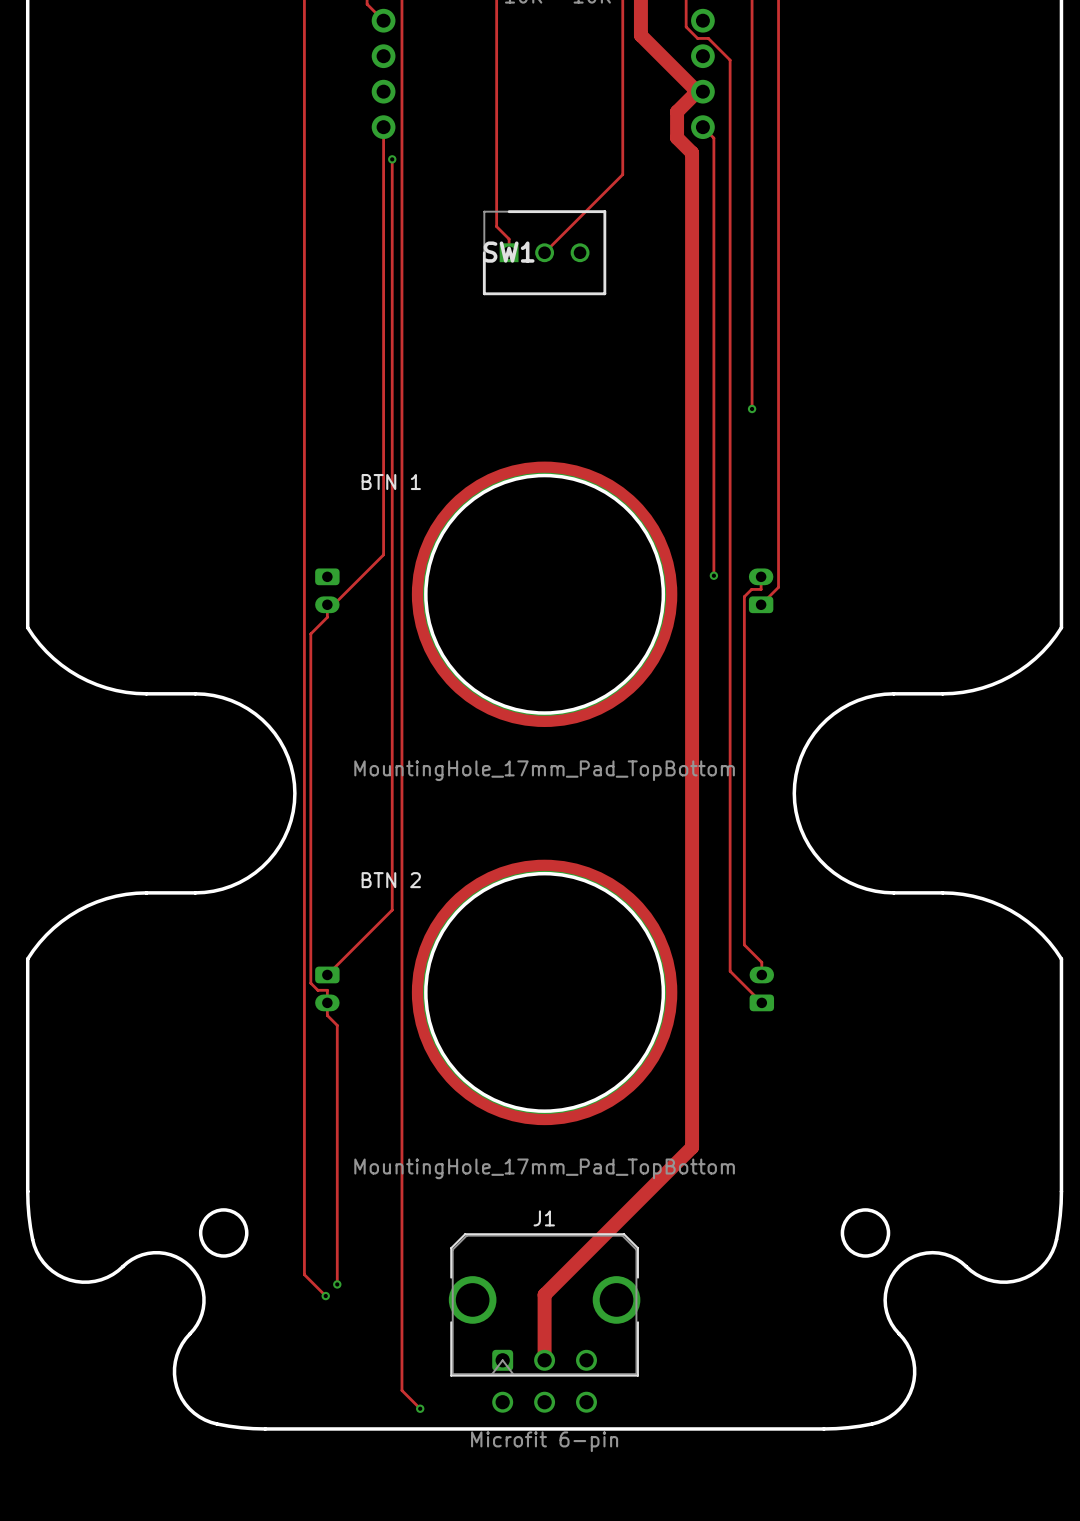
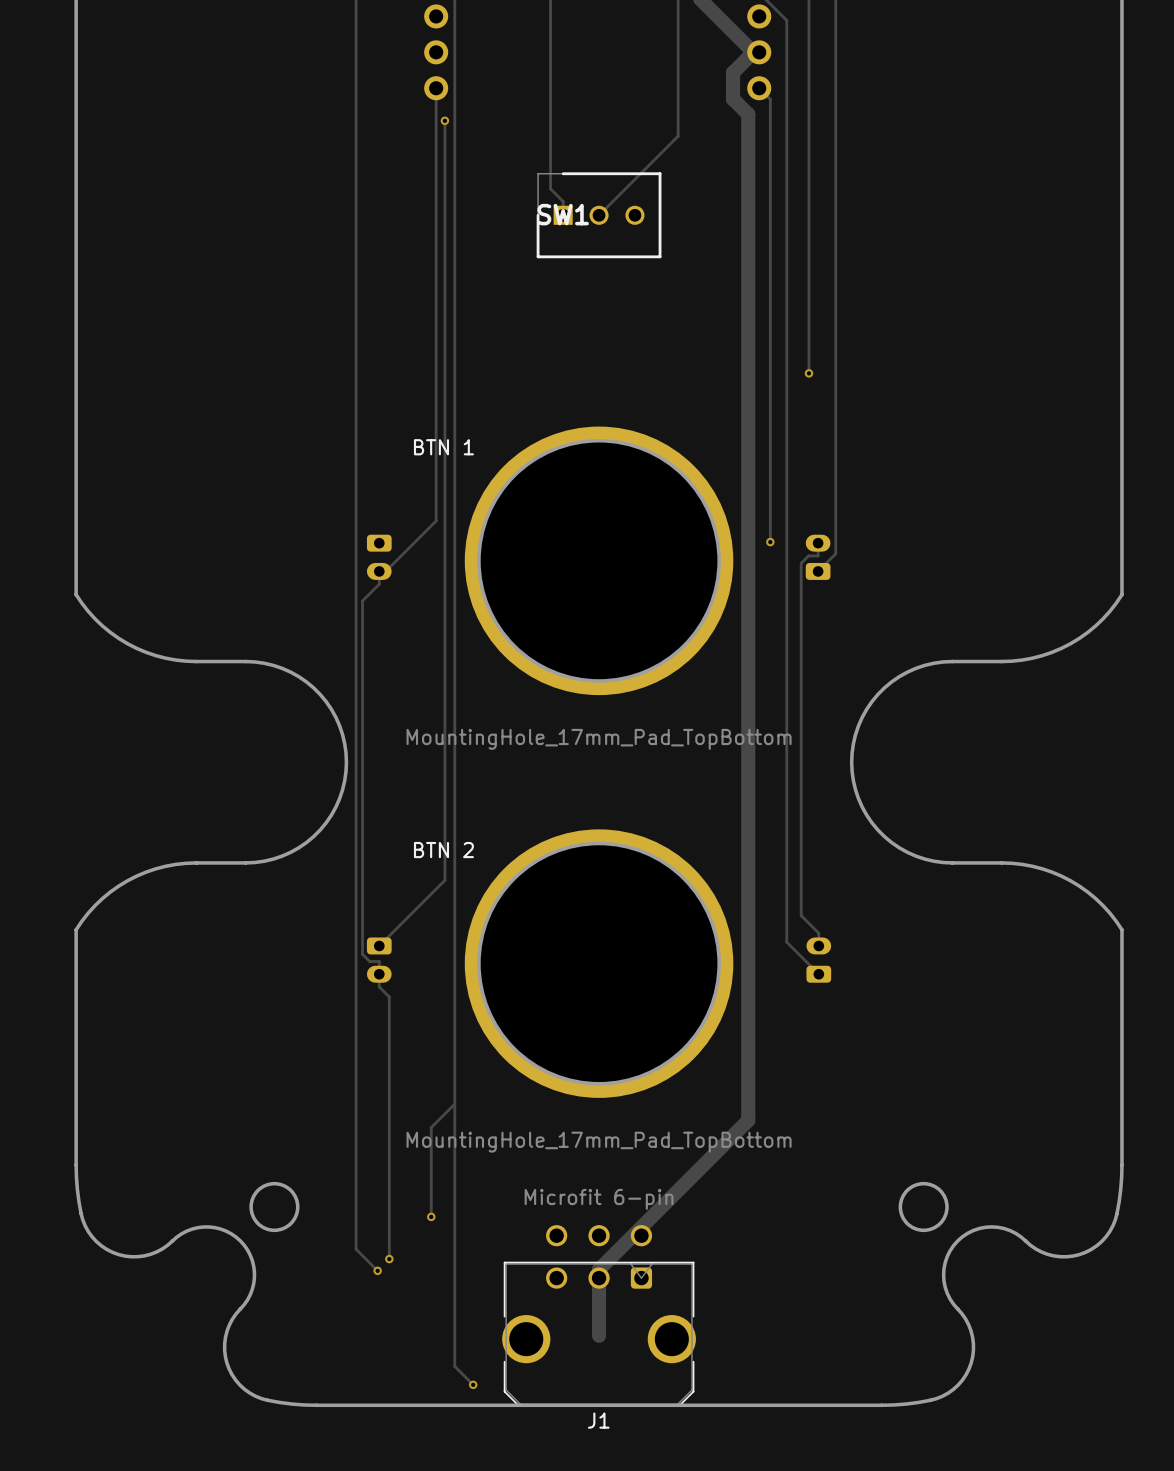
track: none -> (454, 1104) (431, 1127) (431, 1216)
via: none -> (431, 1216)
J1 rotation: 0° (544, 1323) -> 180° (599, 1315)

